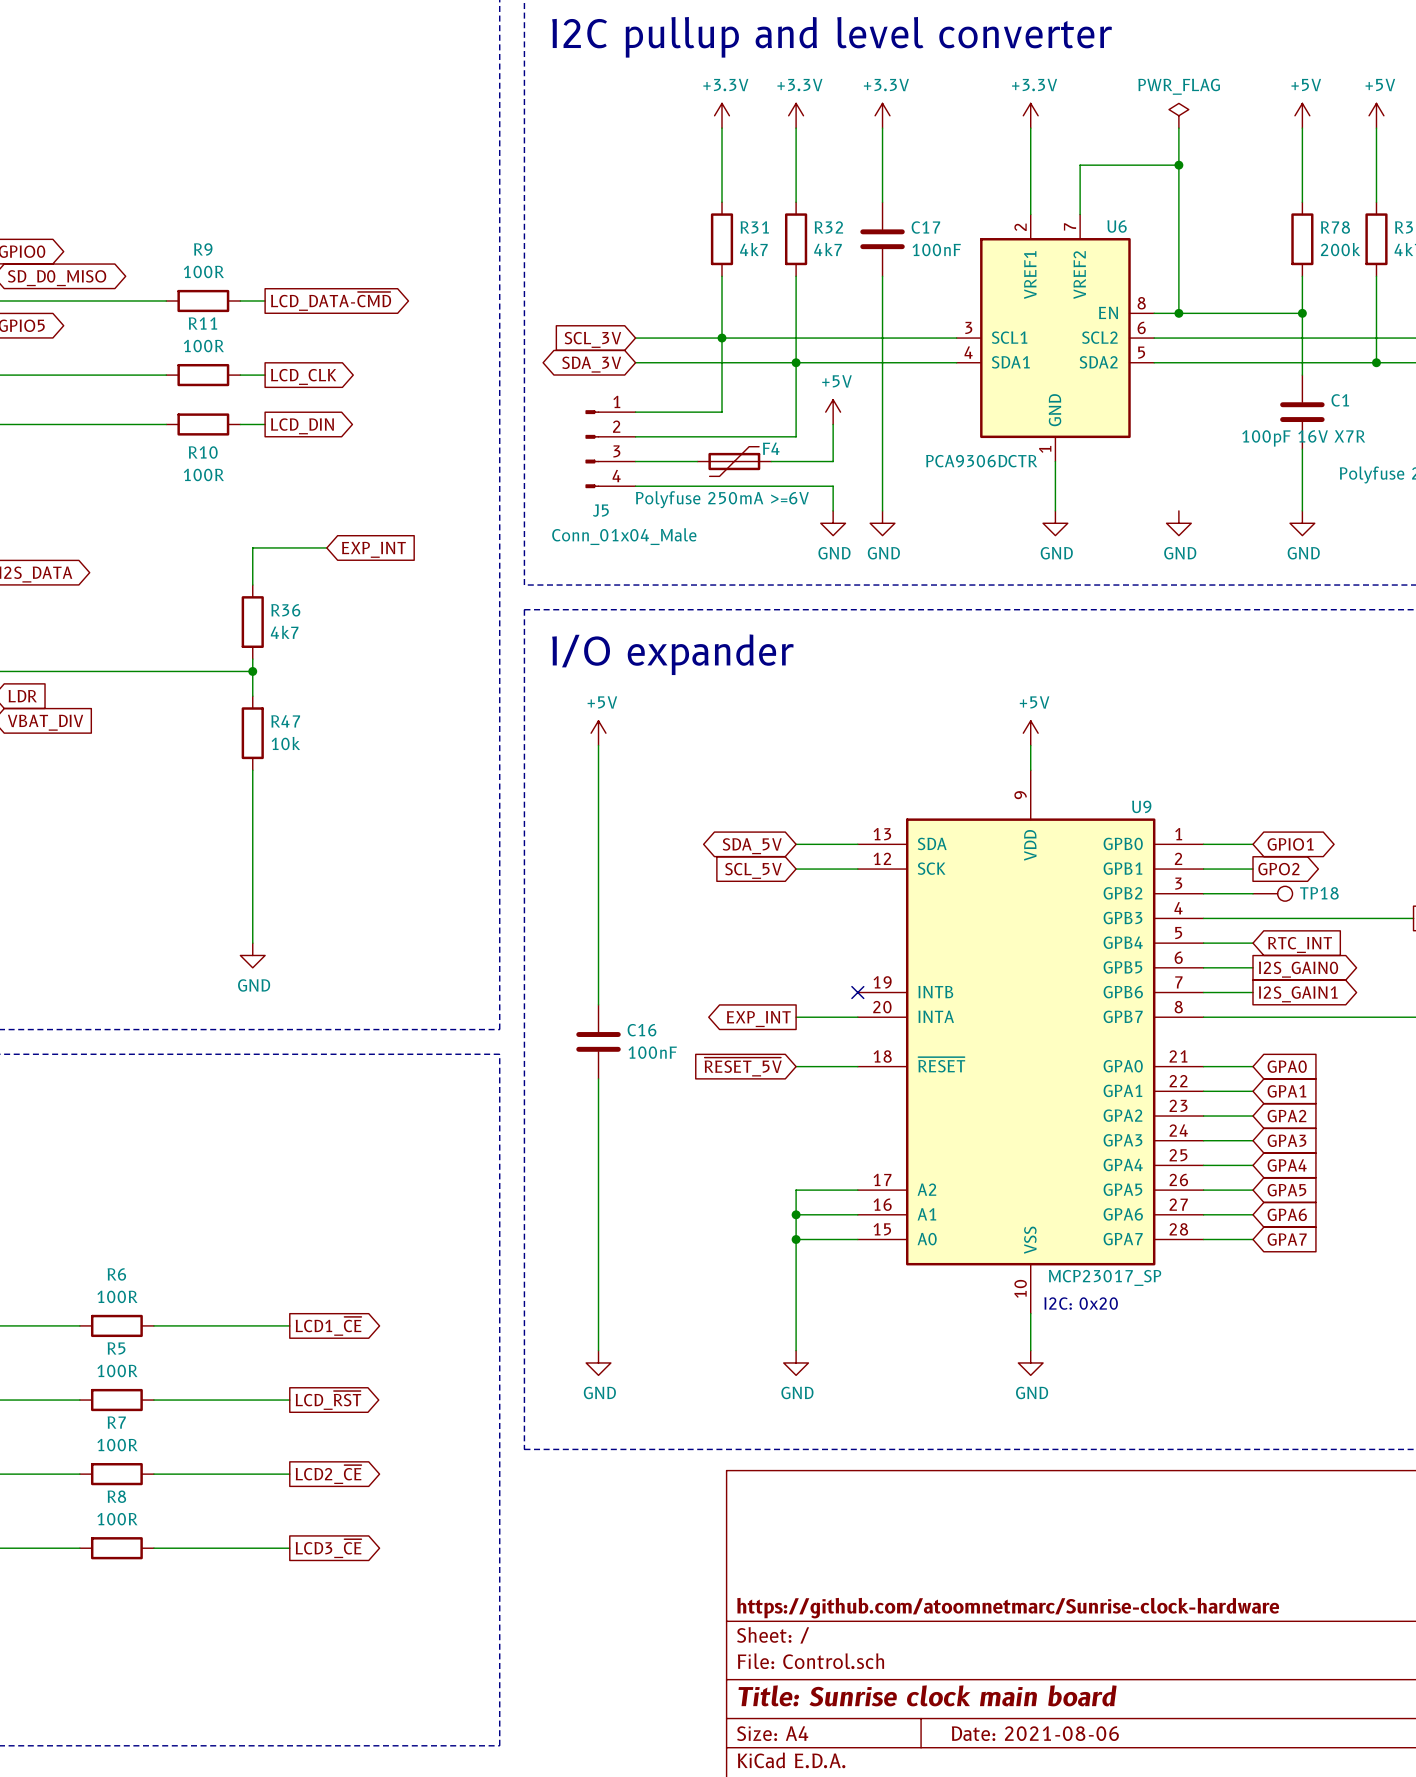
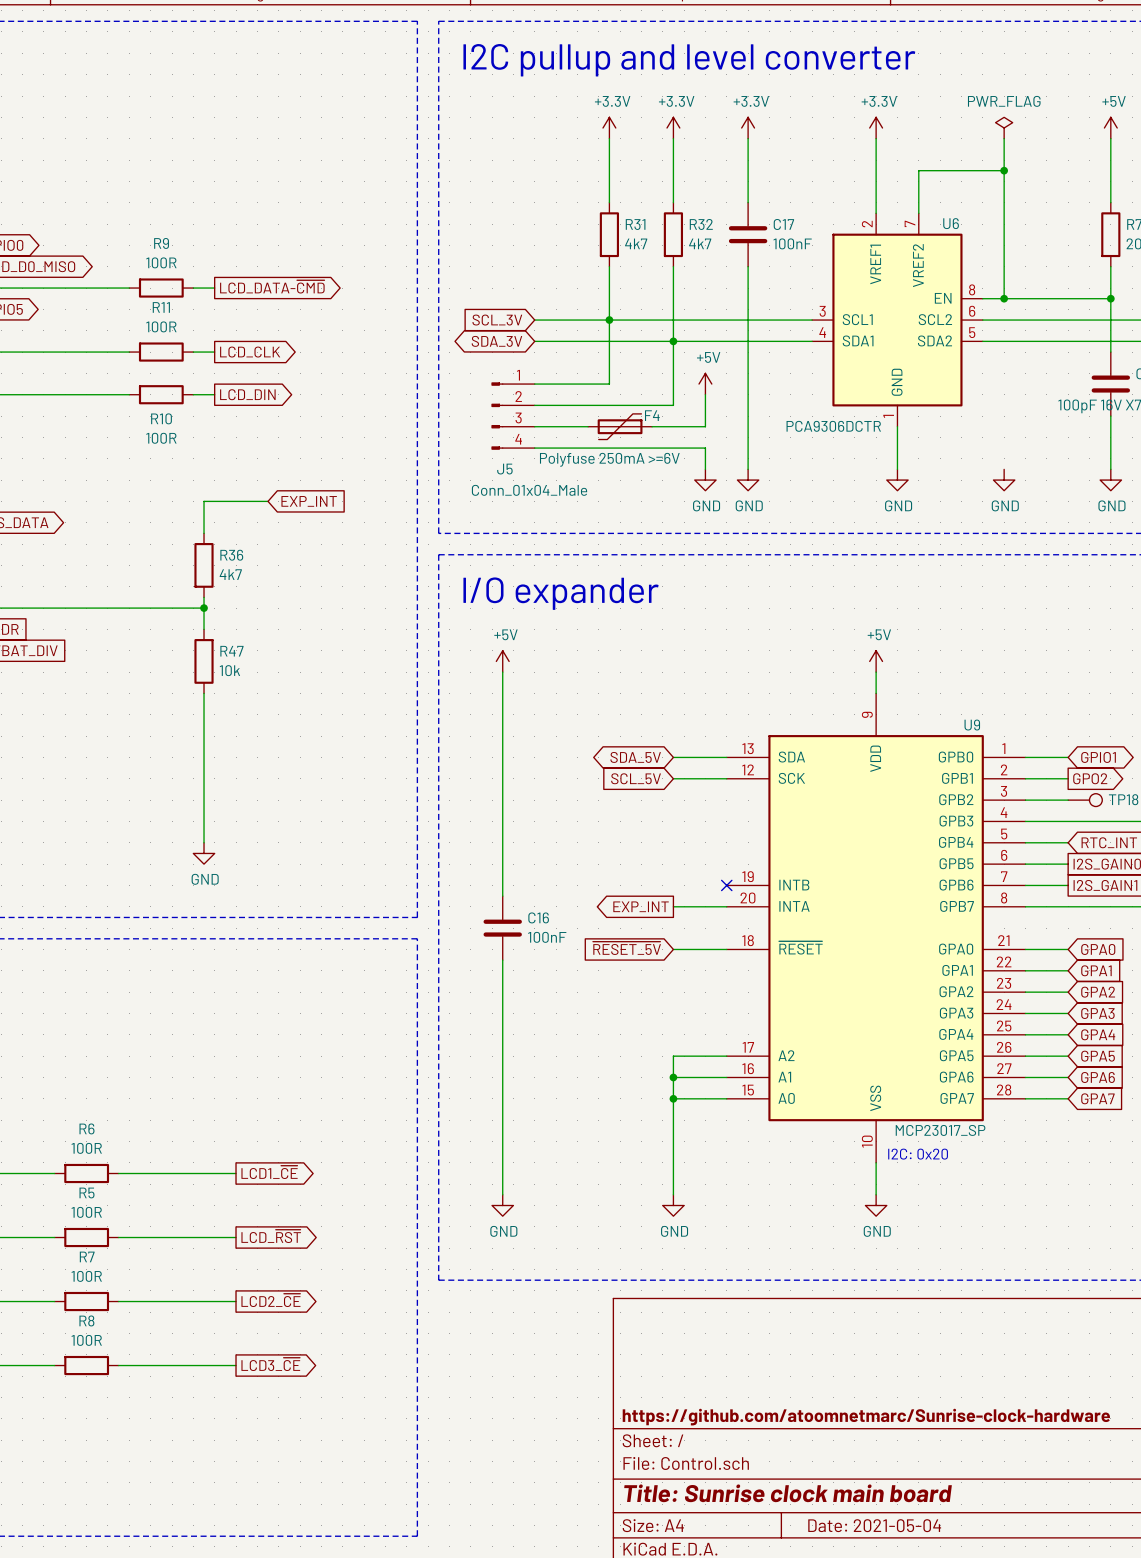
title block: Date: 2021-08-06 (1035, 1733) -> Date: 2021-05-04 (874, 1525)

